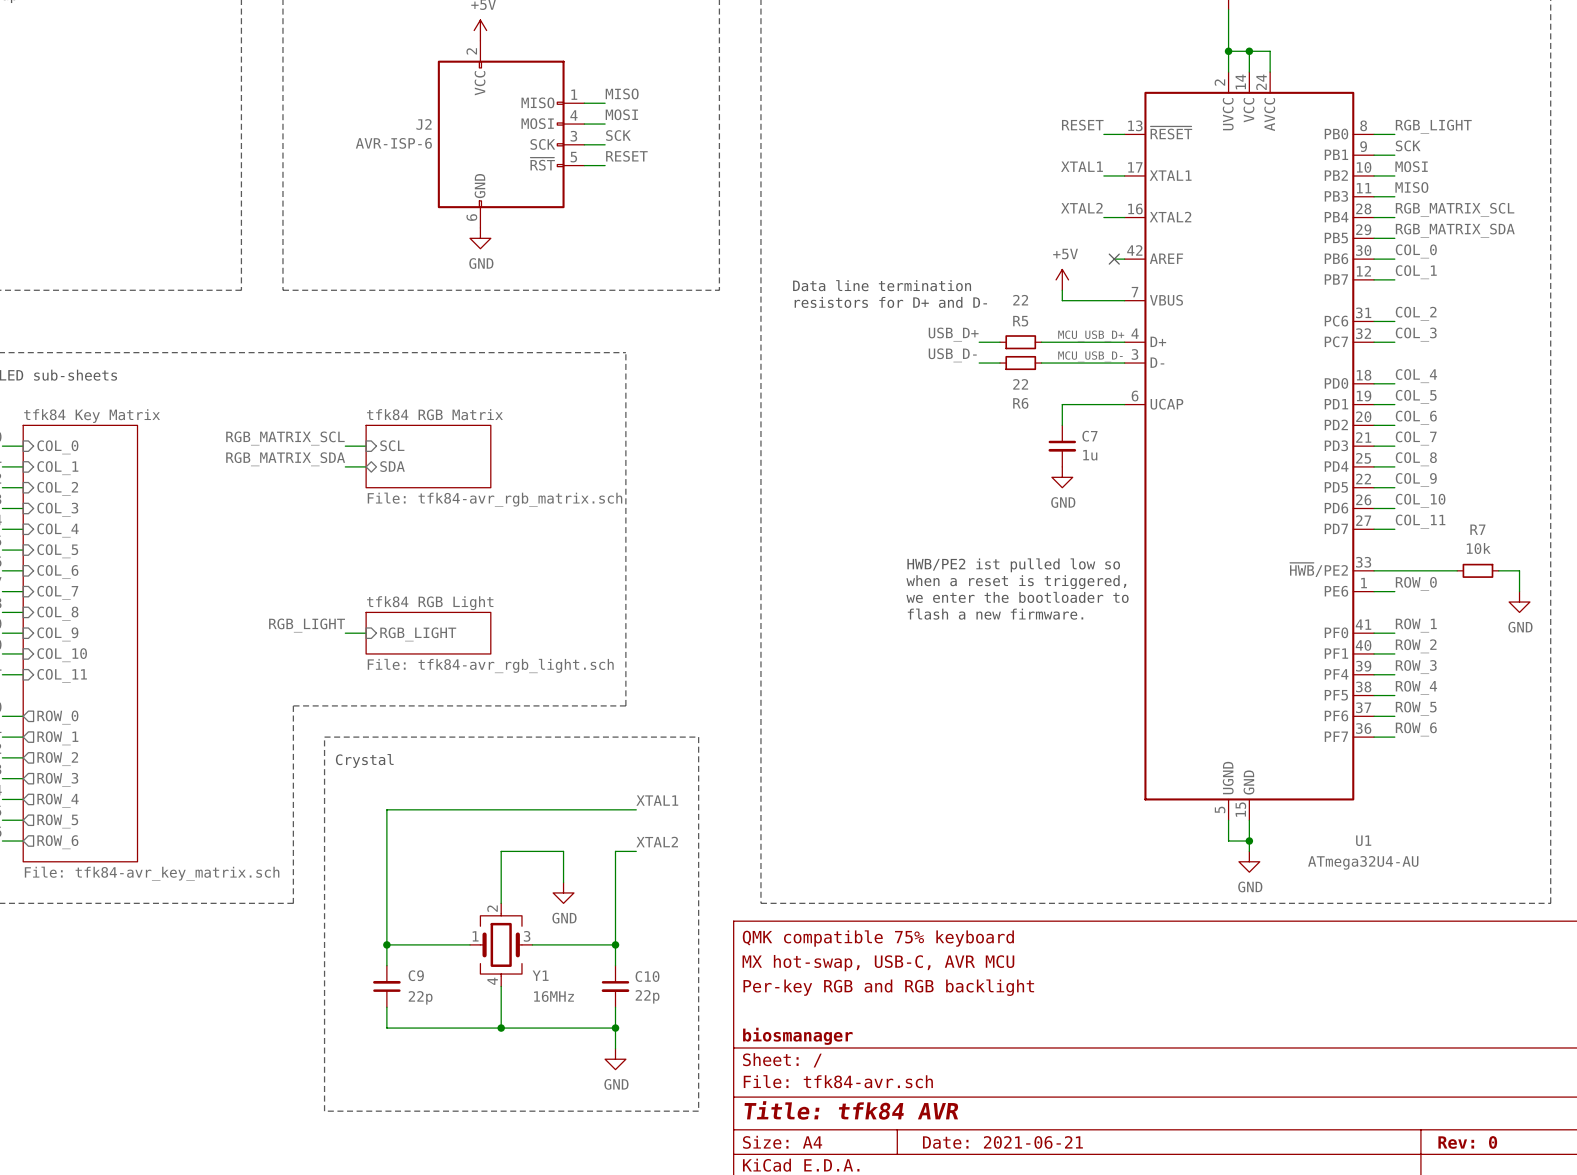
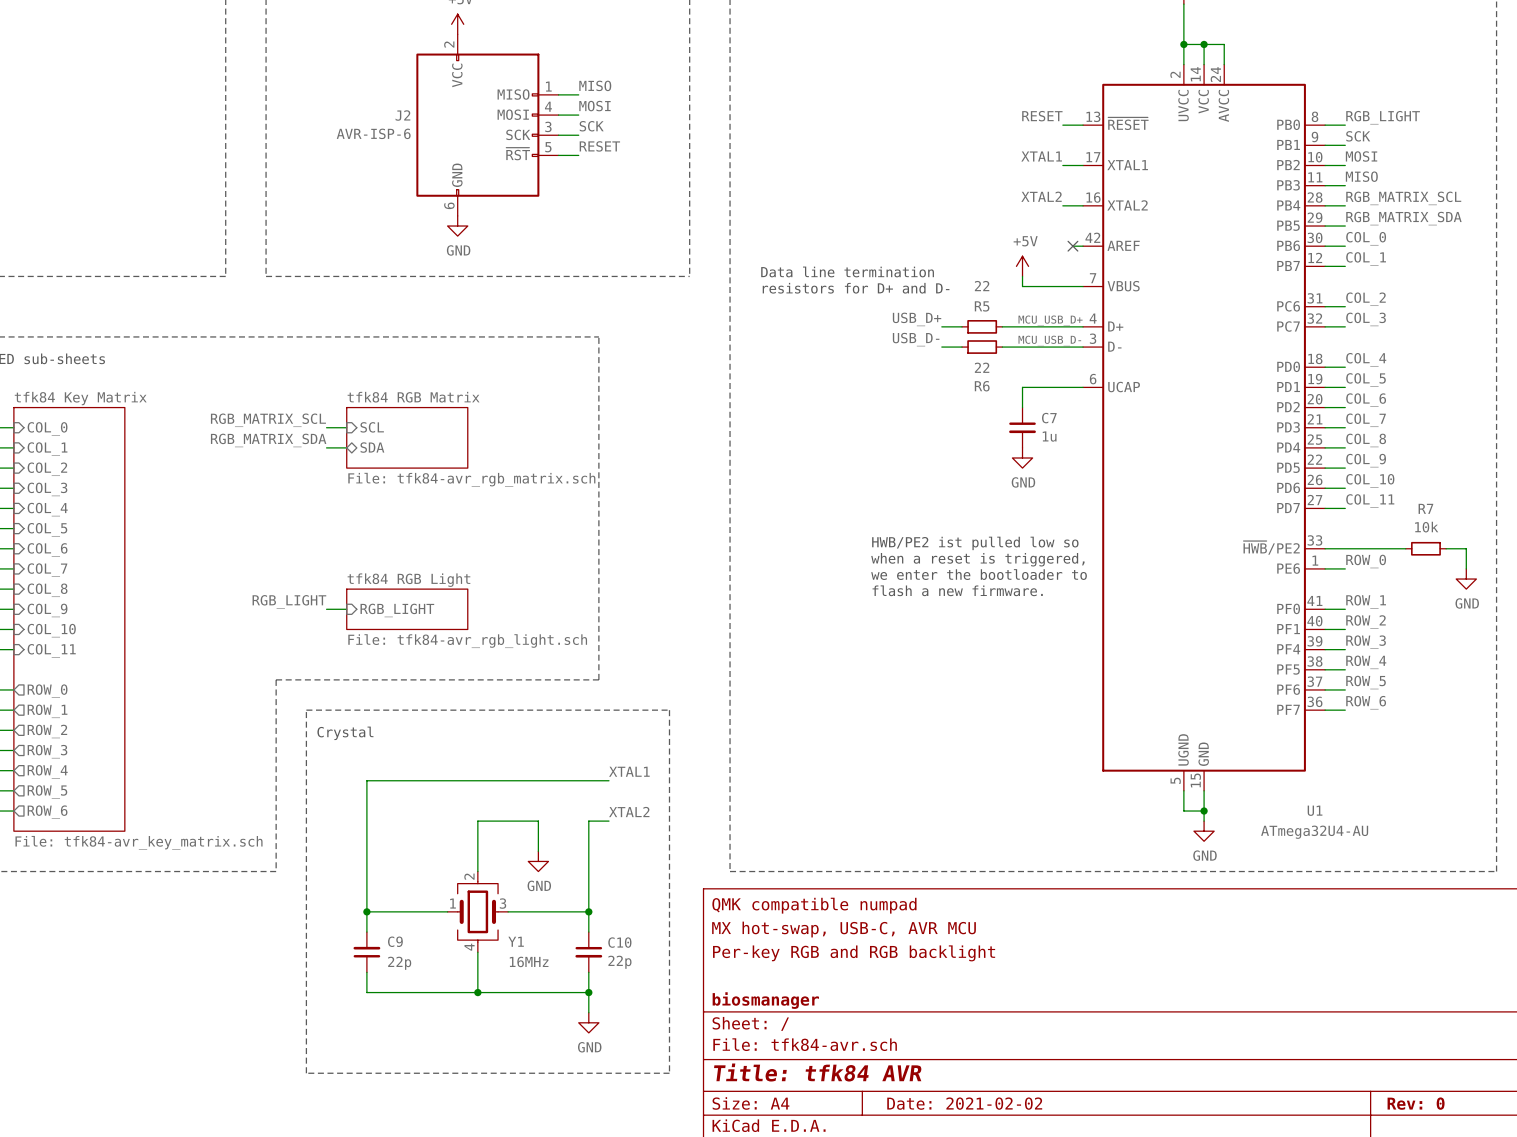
title block: QMK compatible 75% keyboard (878, 938) -> QMK compatible numpad (814, 905)
title block: Date: 2021-06-21 (1002, 1142) -> Date: 2021-02-02 (964, 1103)

